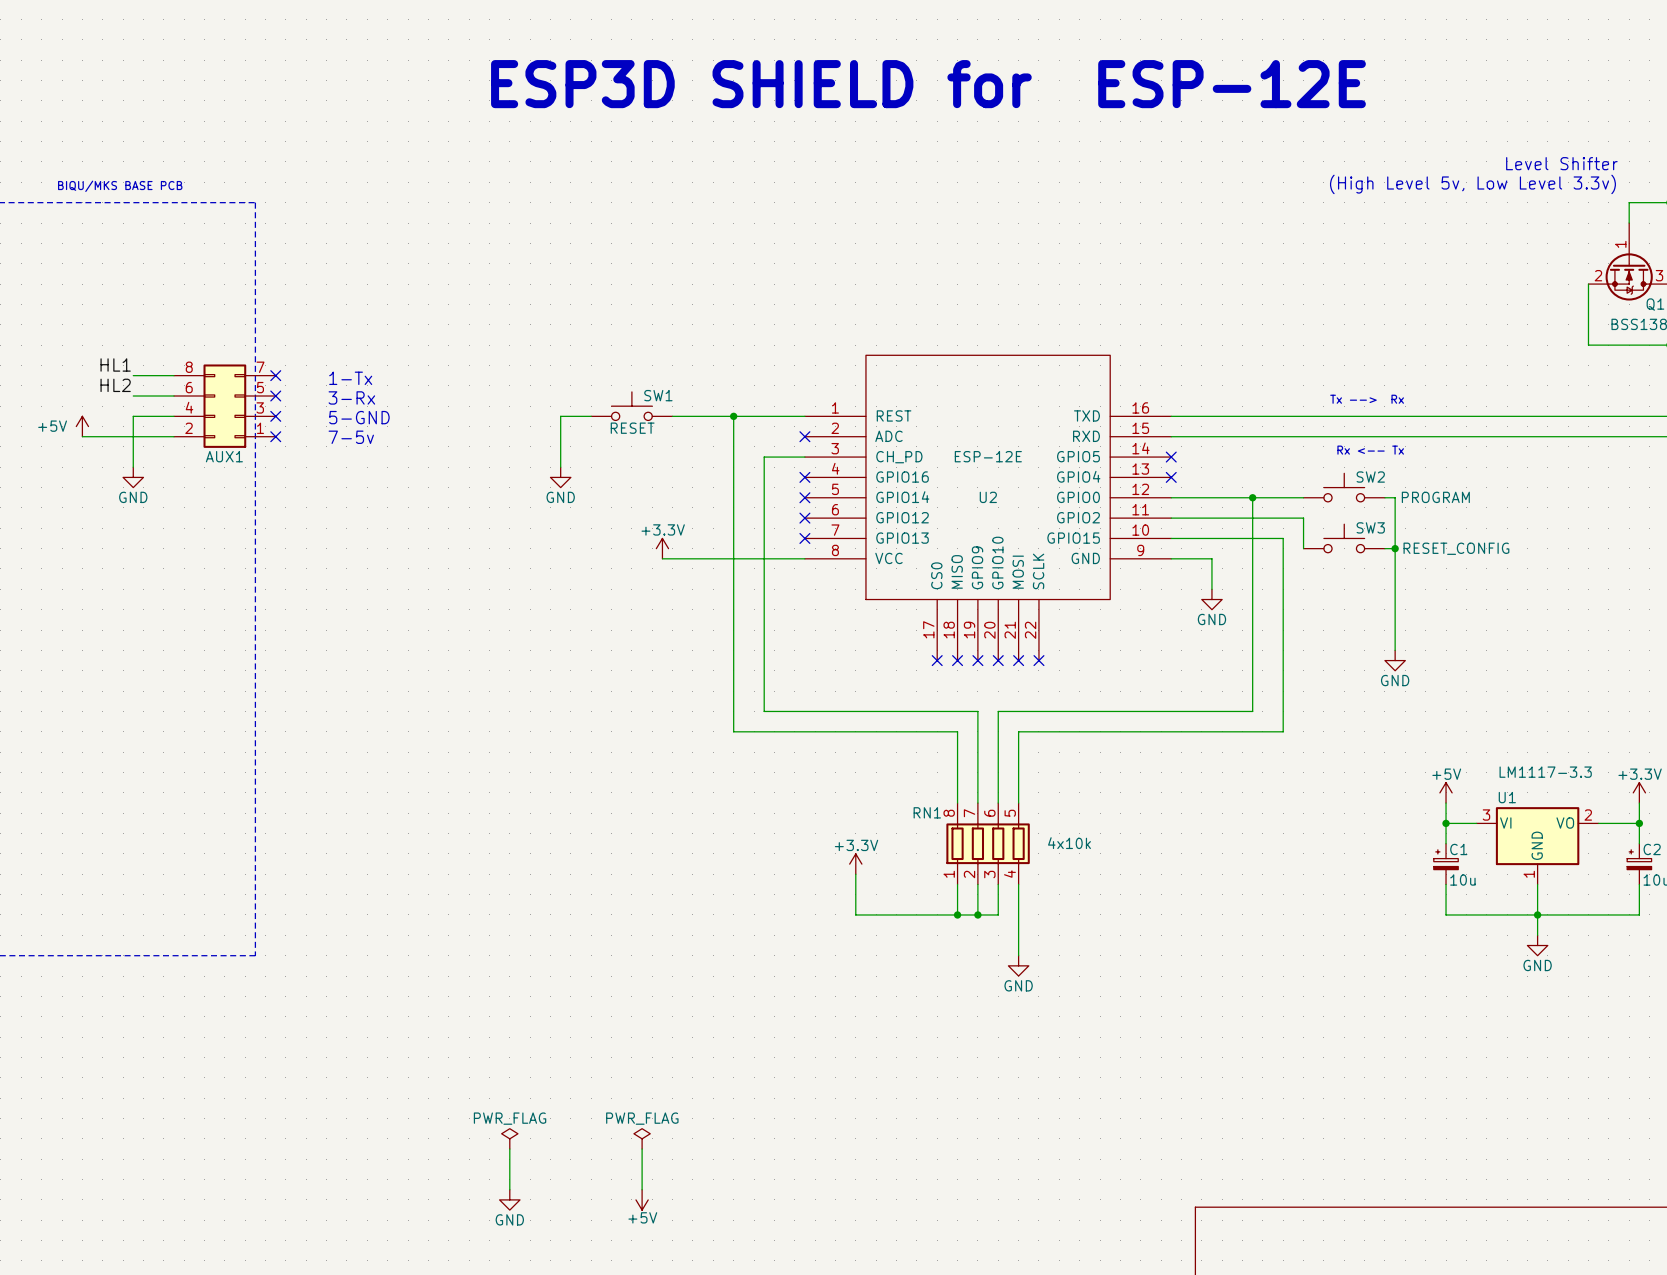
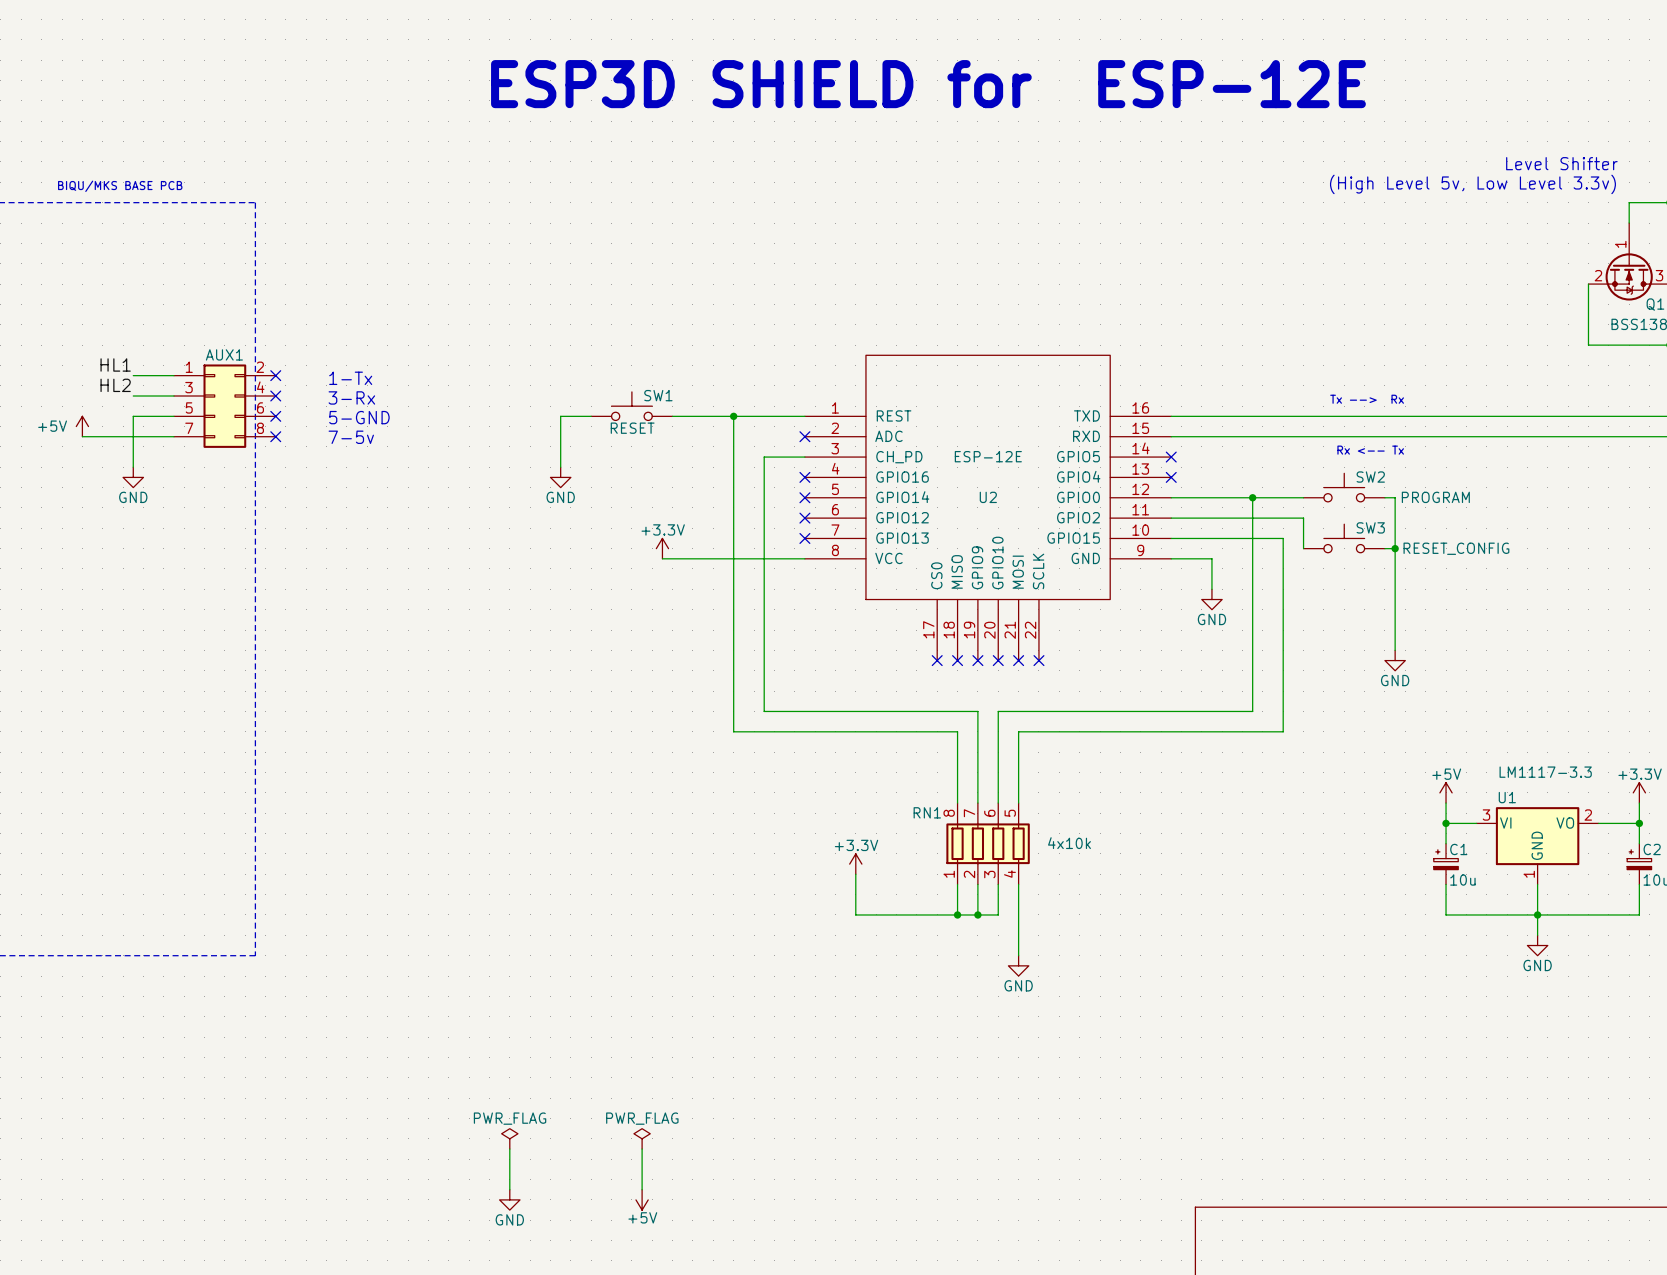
AUX1 rotation: 0° (224, 406) -> 180° (224, 406)

